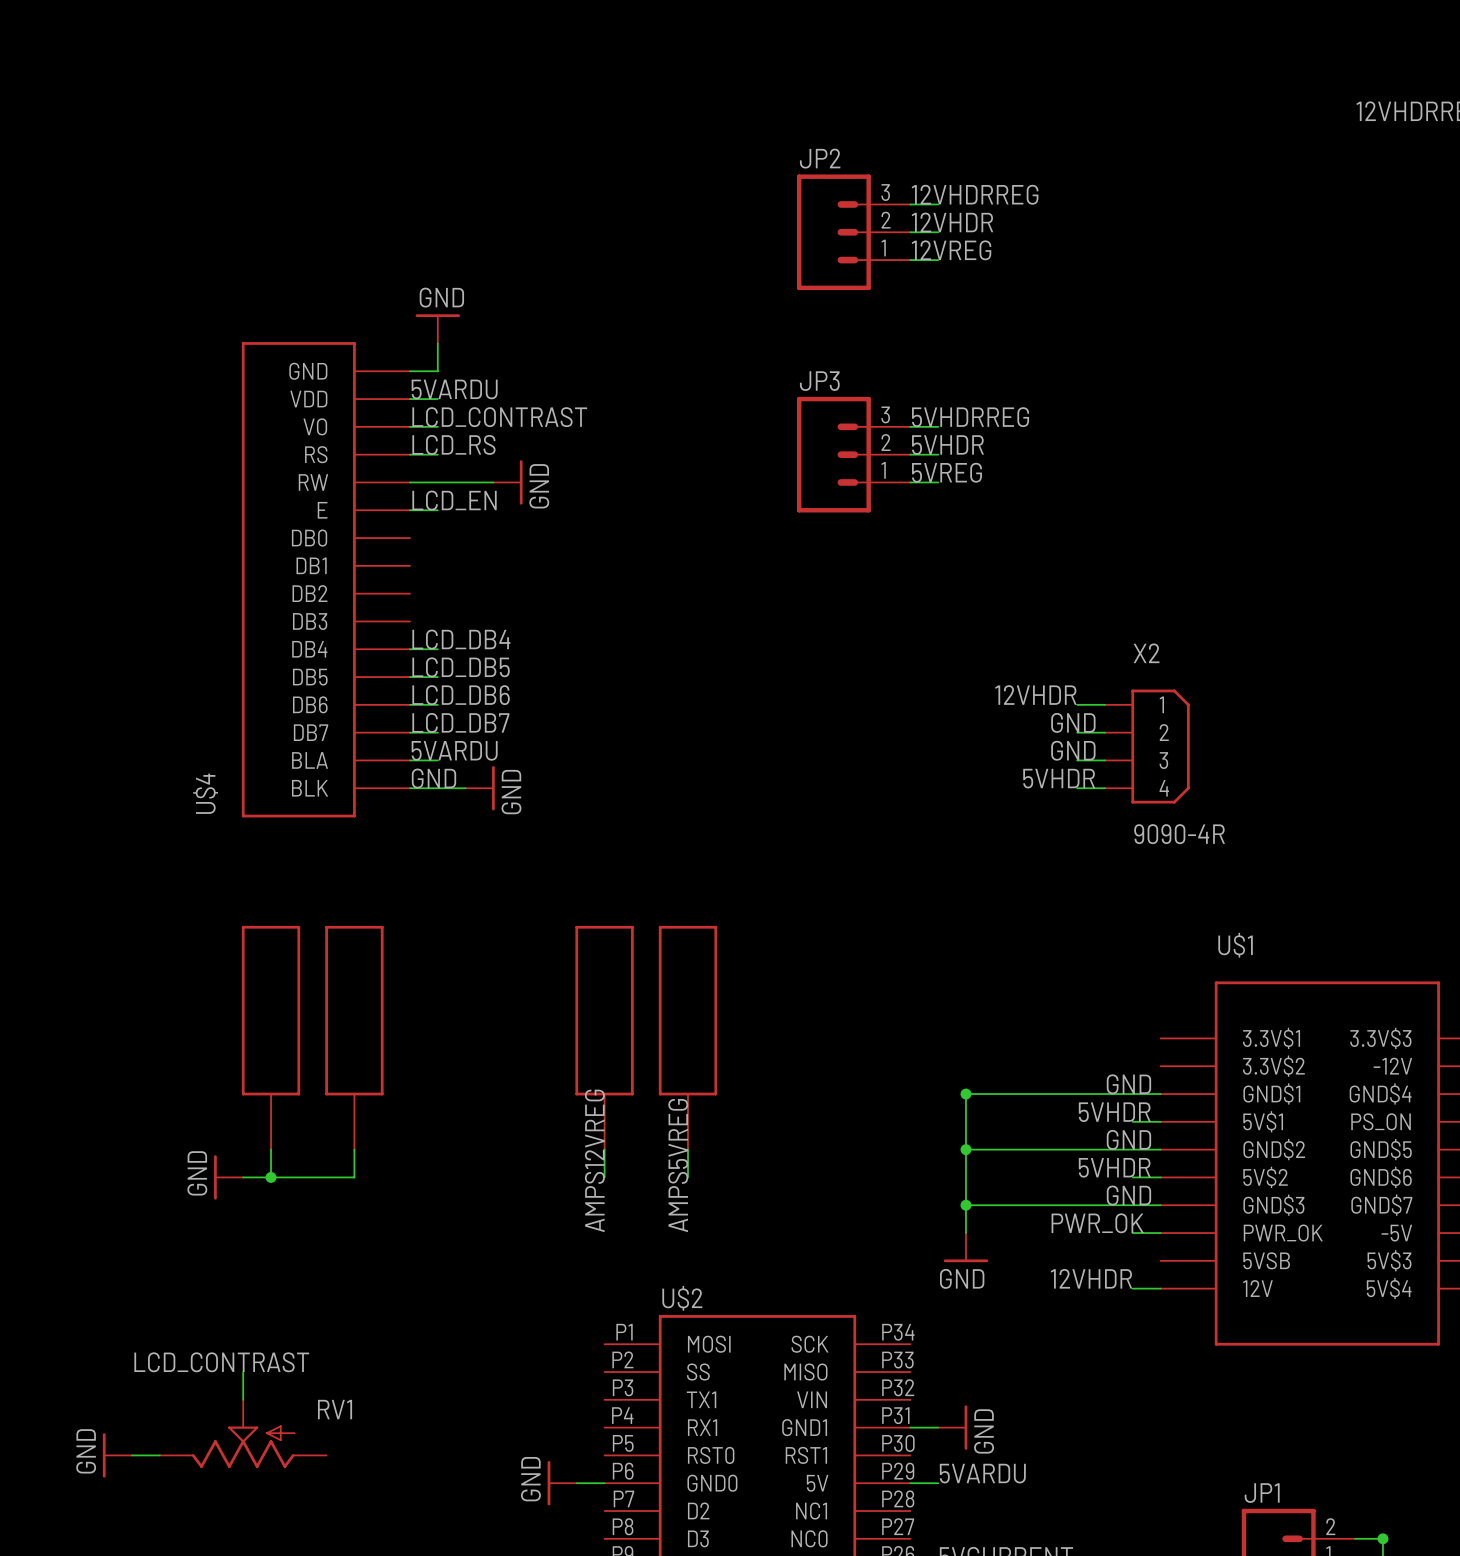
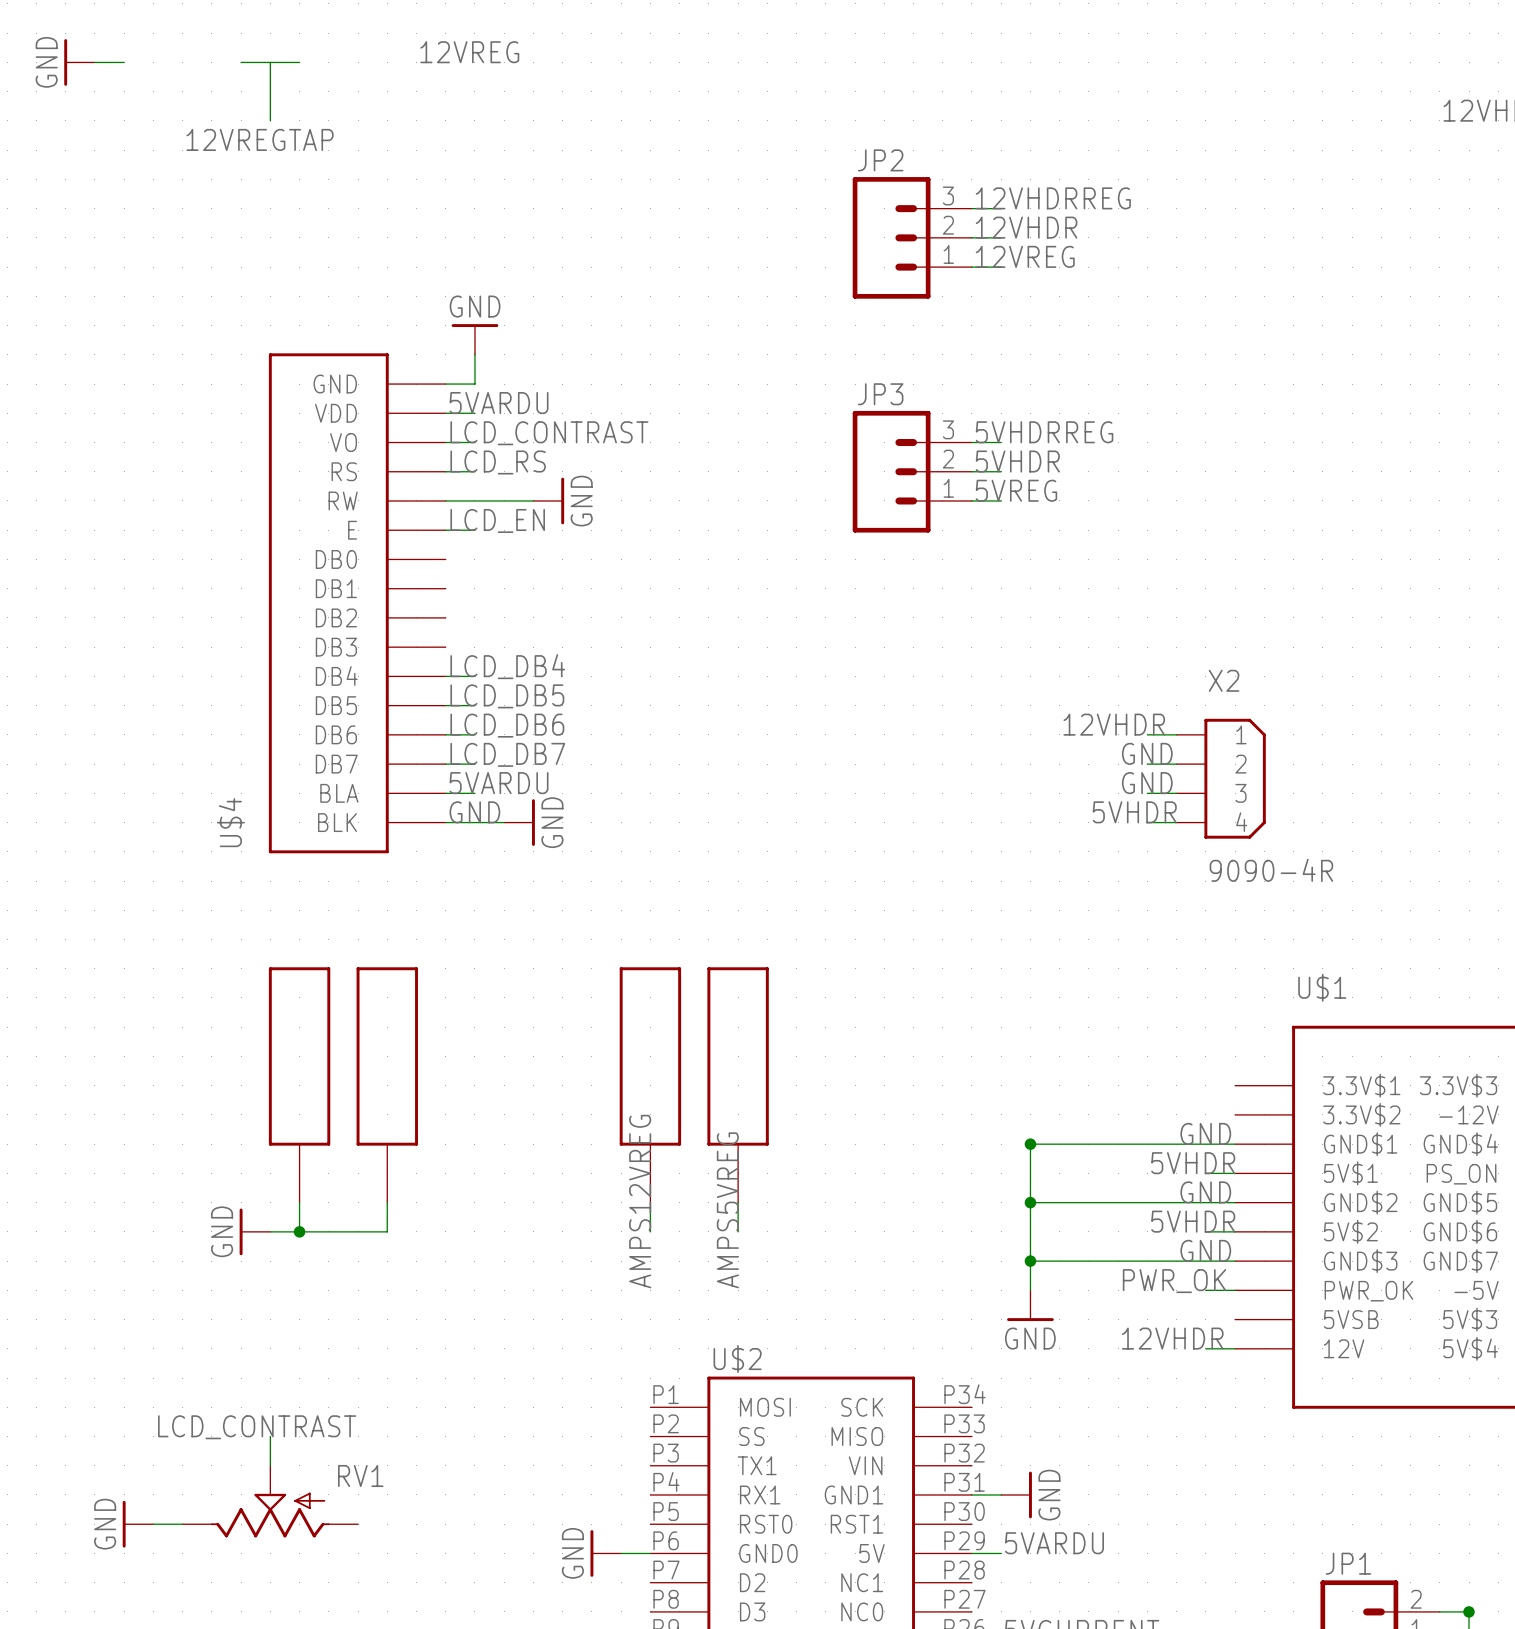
label: none -> 12VREG (469, 52)
power symbol: none -> GND (79, 62)
wire: none -> (94, 62) (124, 62)
wire: none -> (241, 62) (299, 62)
wire: none -> (270, 62) (270, 120)
label: none -> 12VREGTAP (260, 139)

